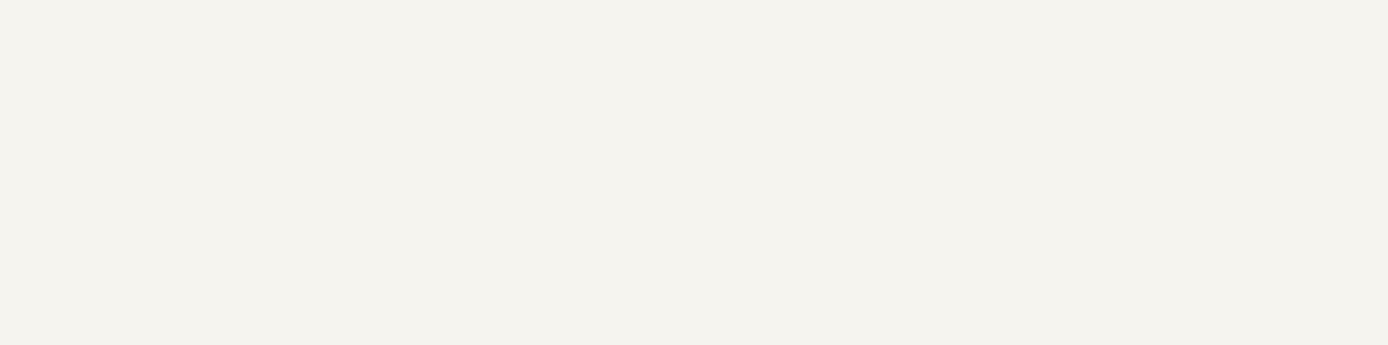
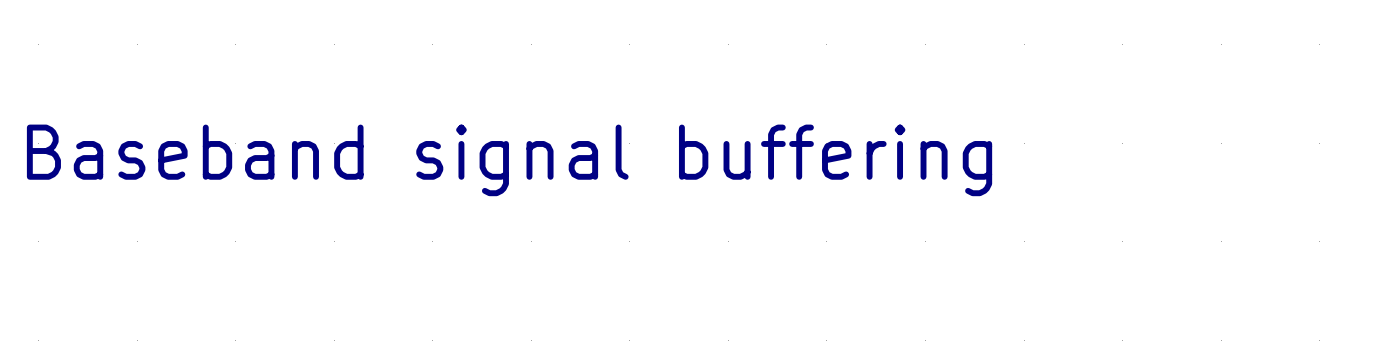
text: none -> Baseband signal buffering (509, 160)

